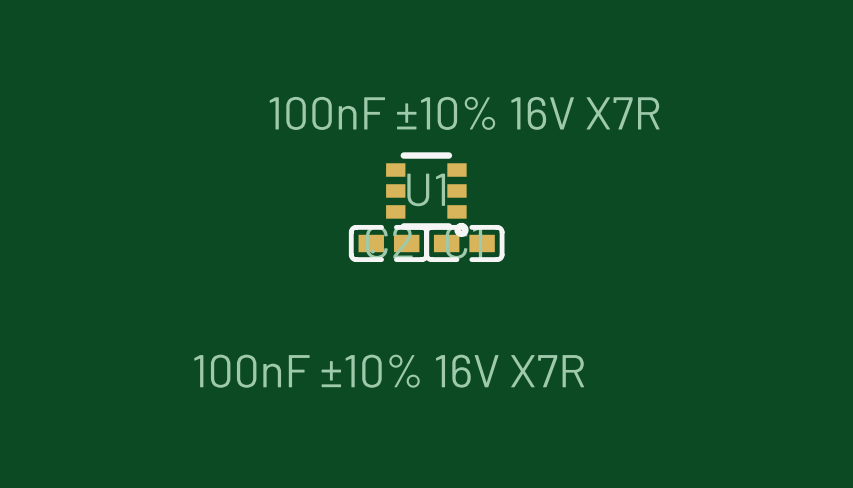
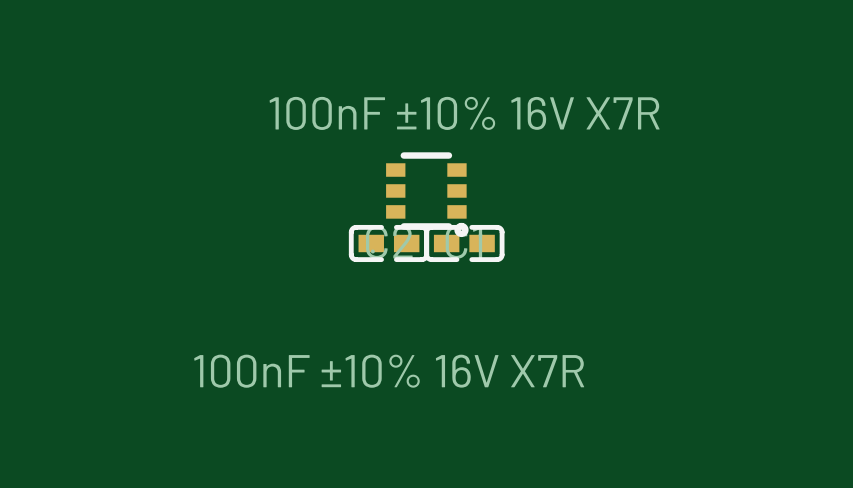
U1 name: U1 (426, 189) -> none

